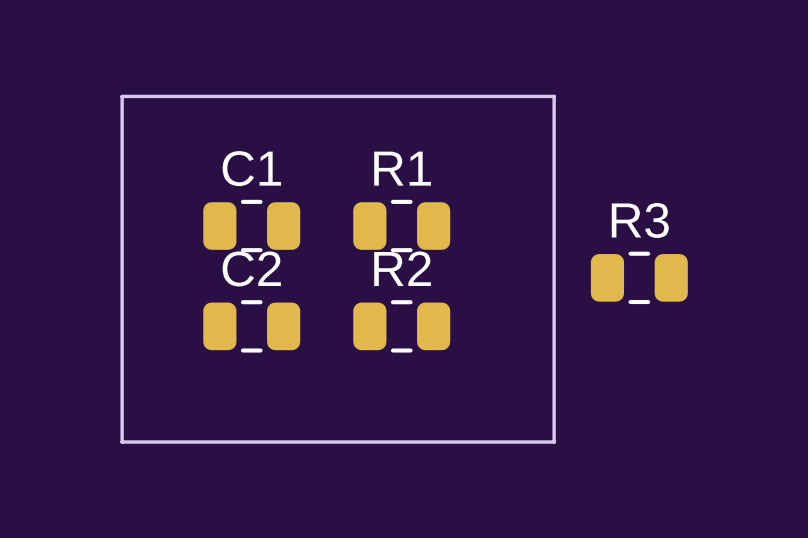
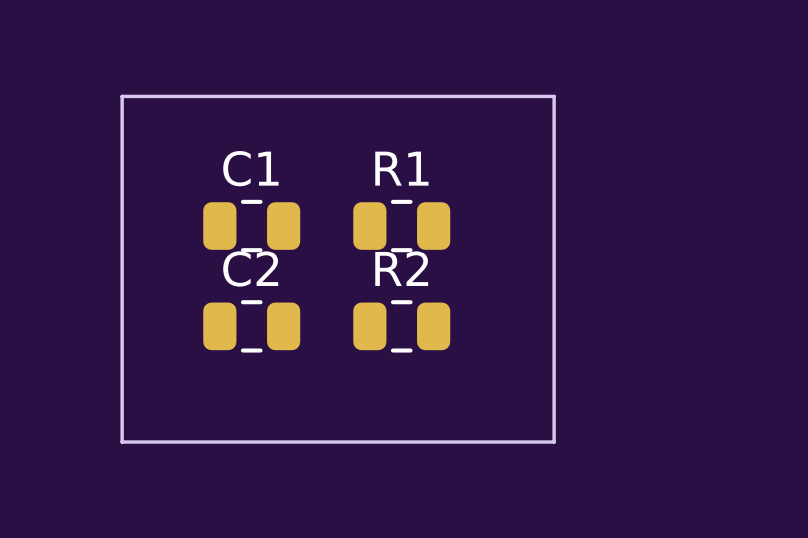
R3: (639, 277) -> none

